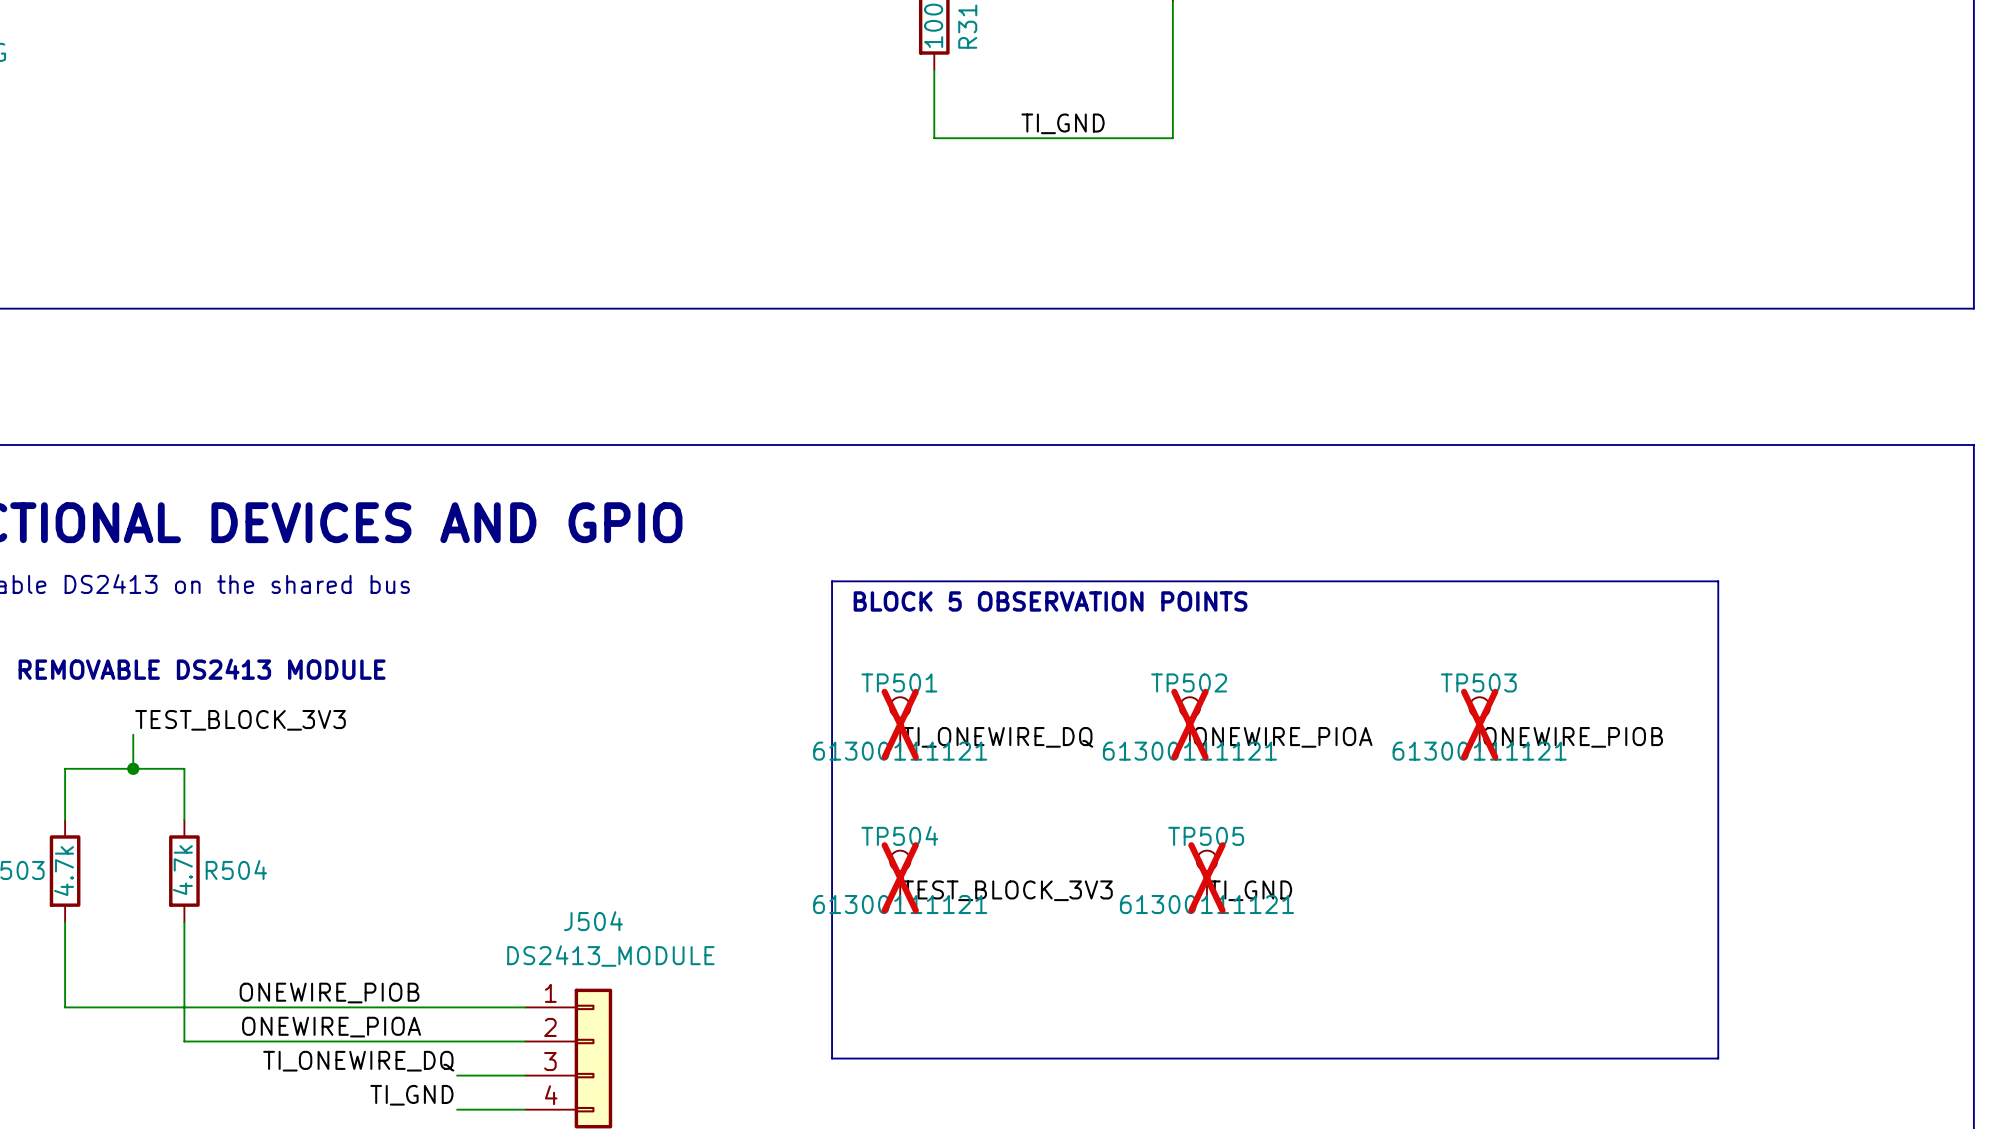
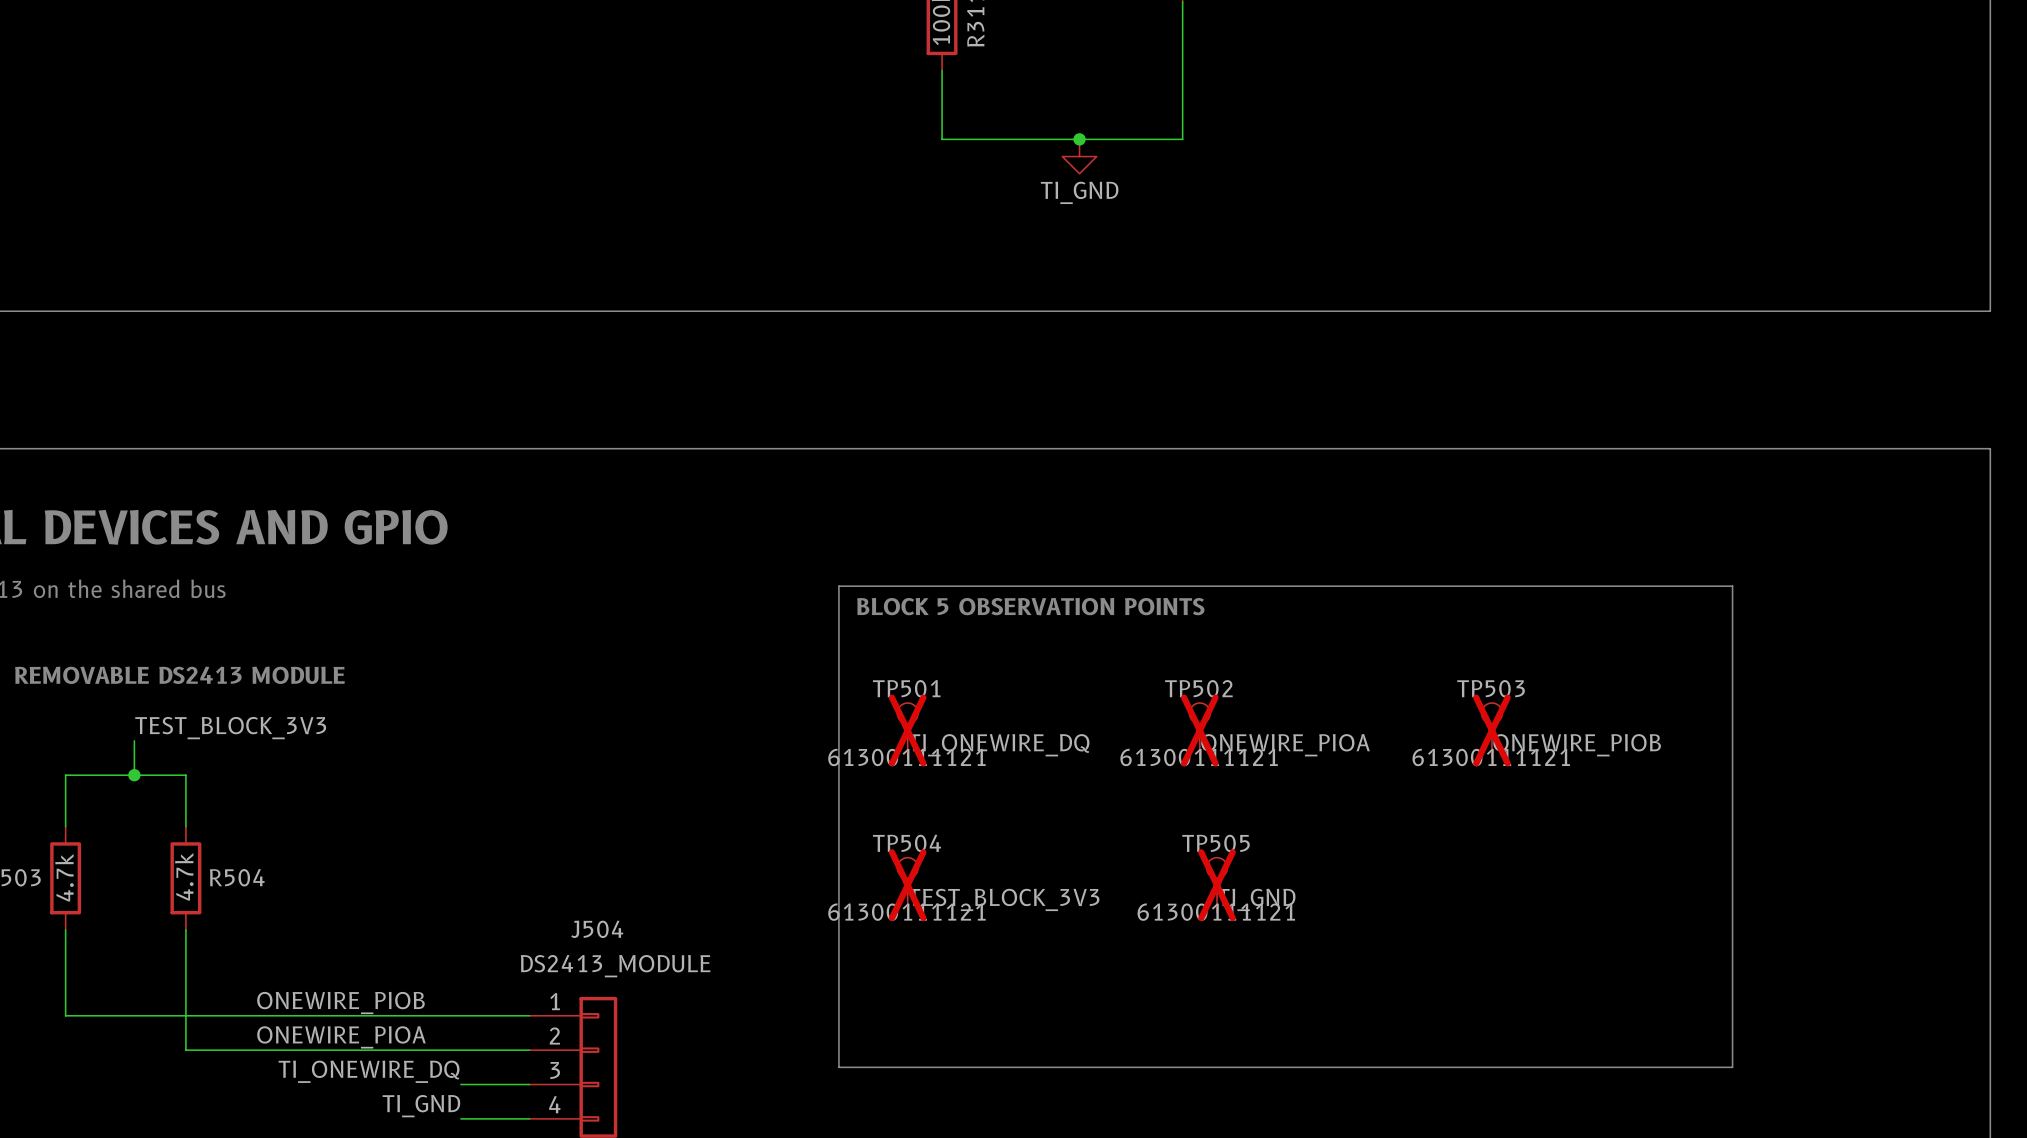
label: TI_GND (1063, 123) -> none
junction: none -> (1079, 139)
power symbol: none -> TI_GND (1079, 156)

